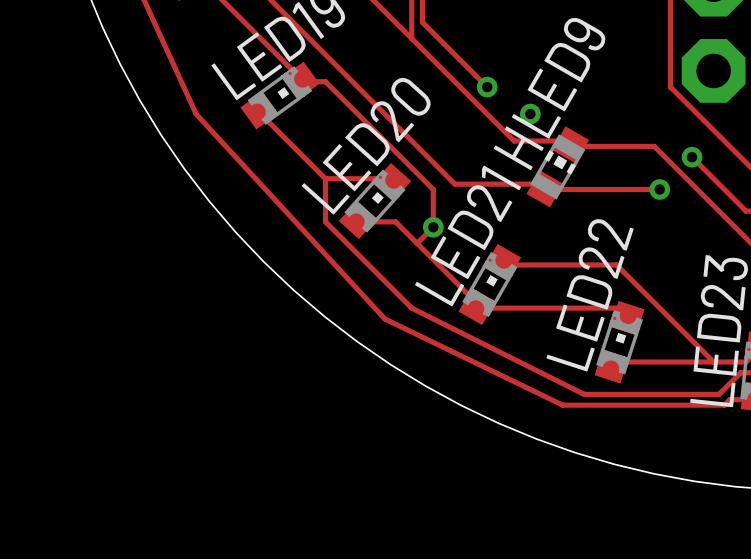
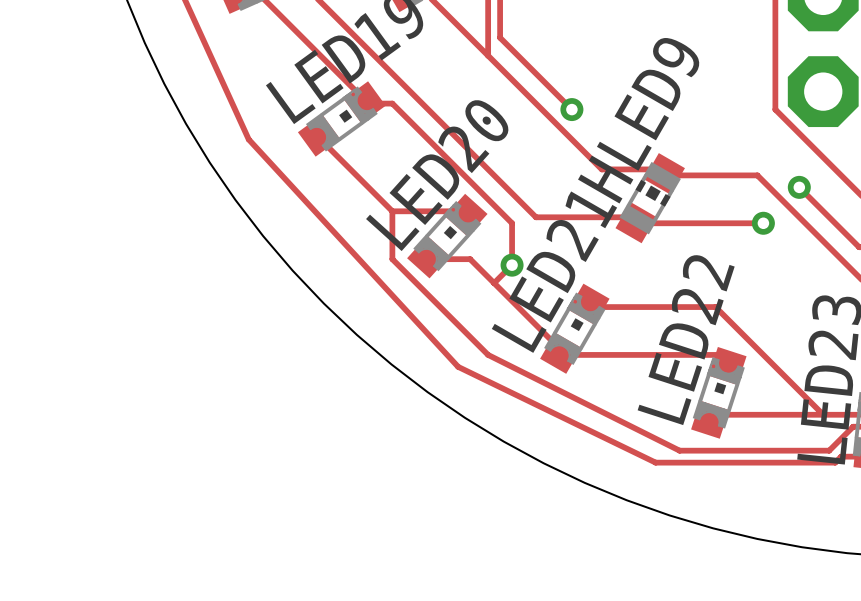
via: (530, 114) -> none

